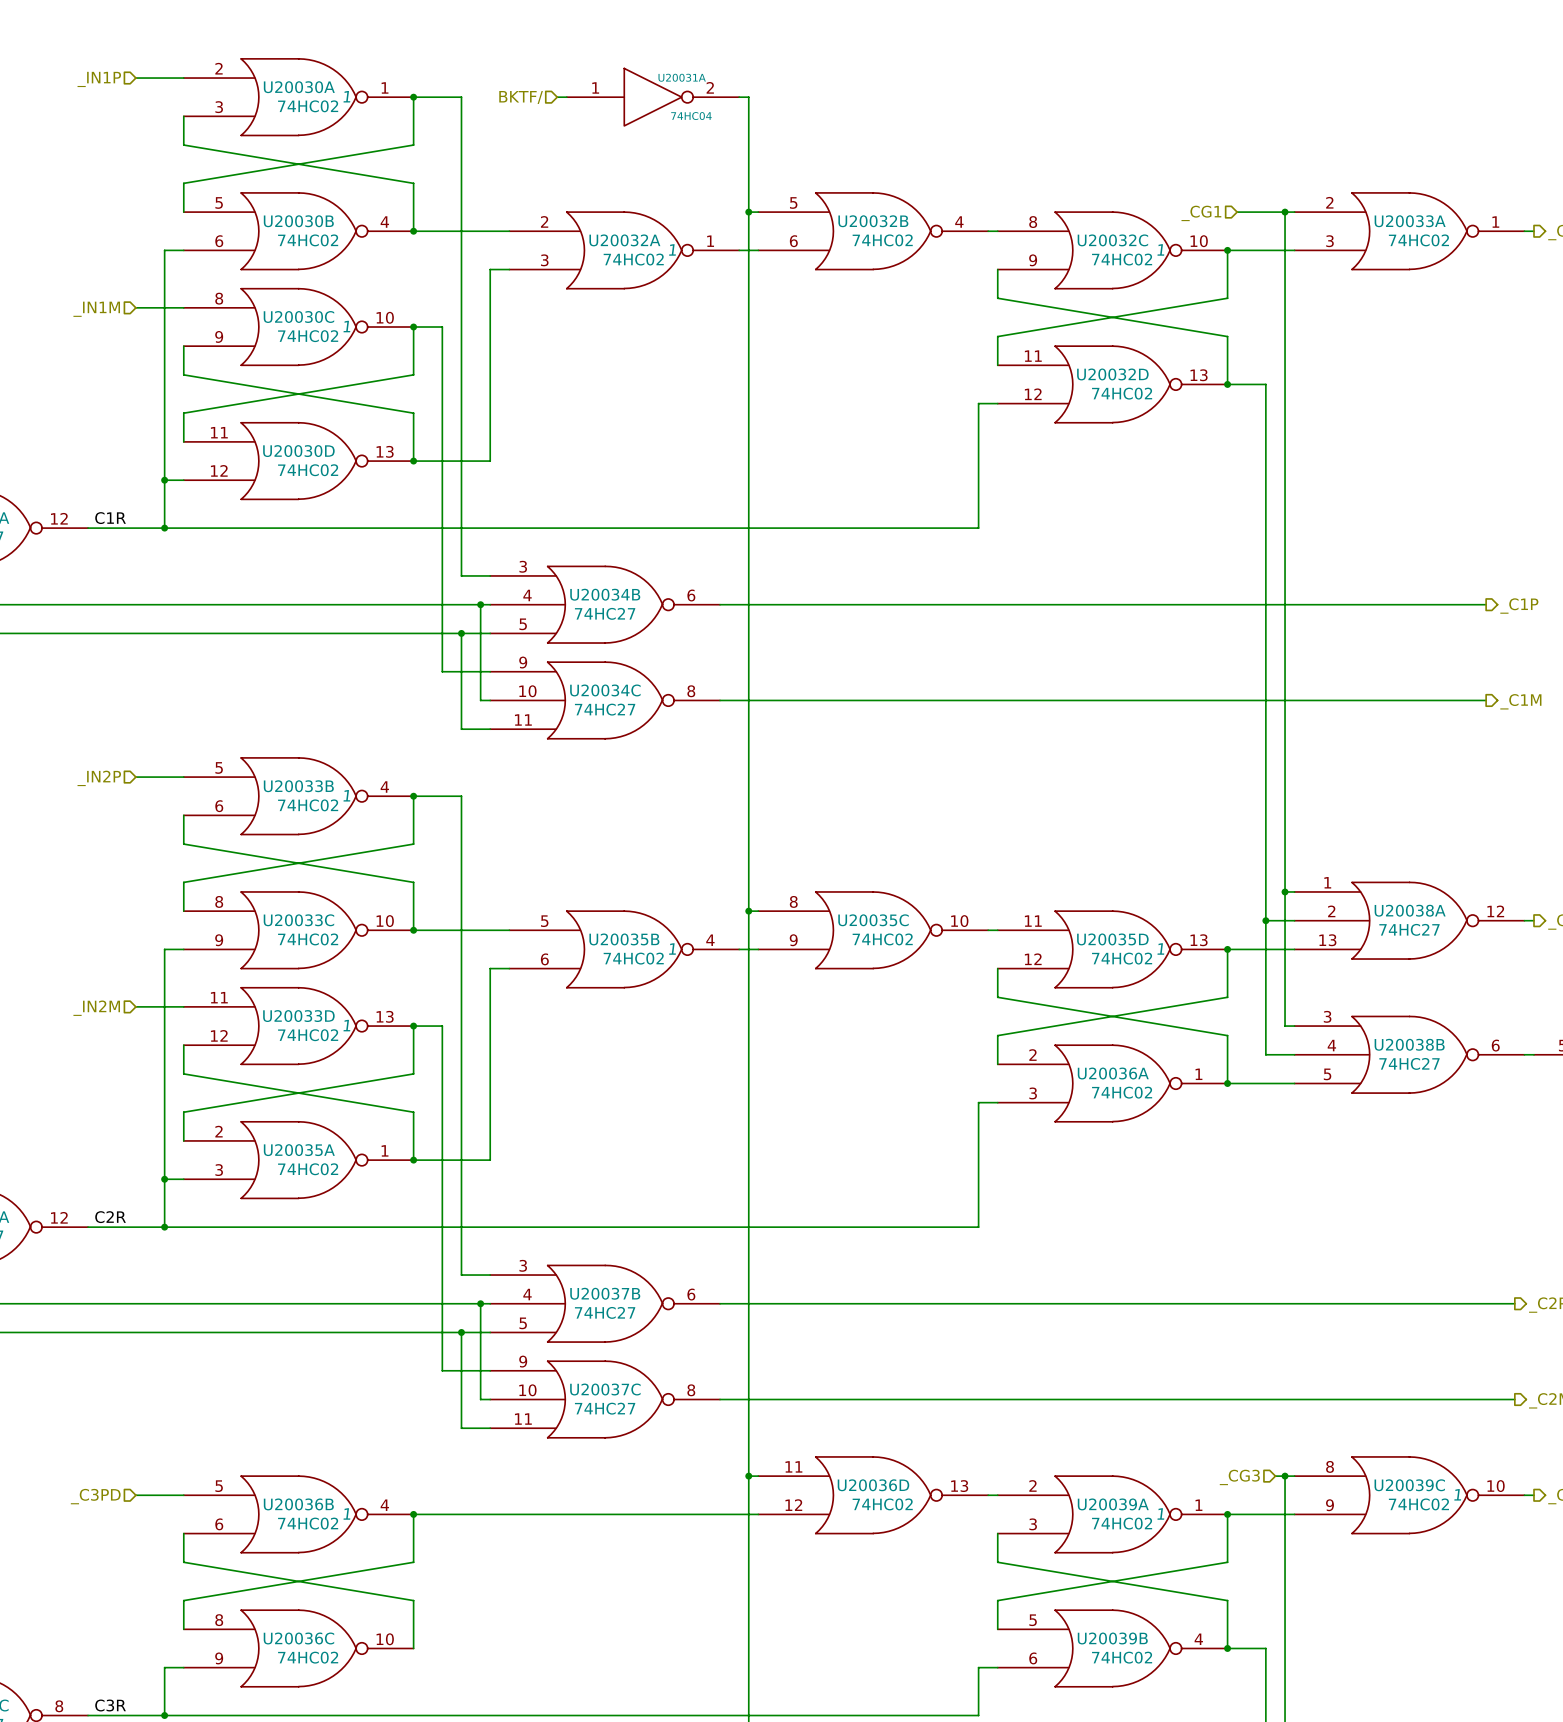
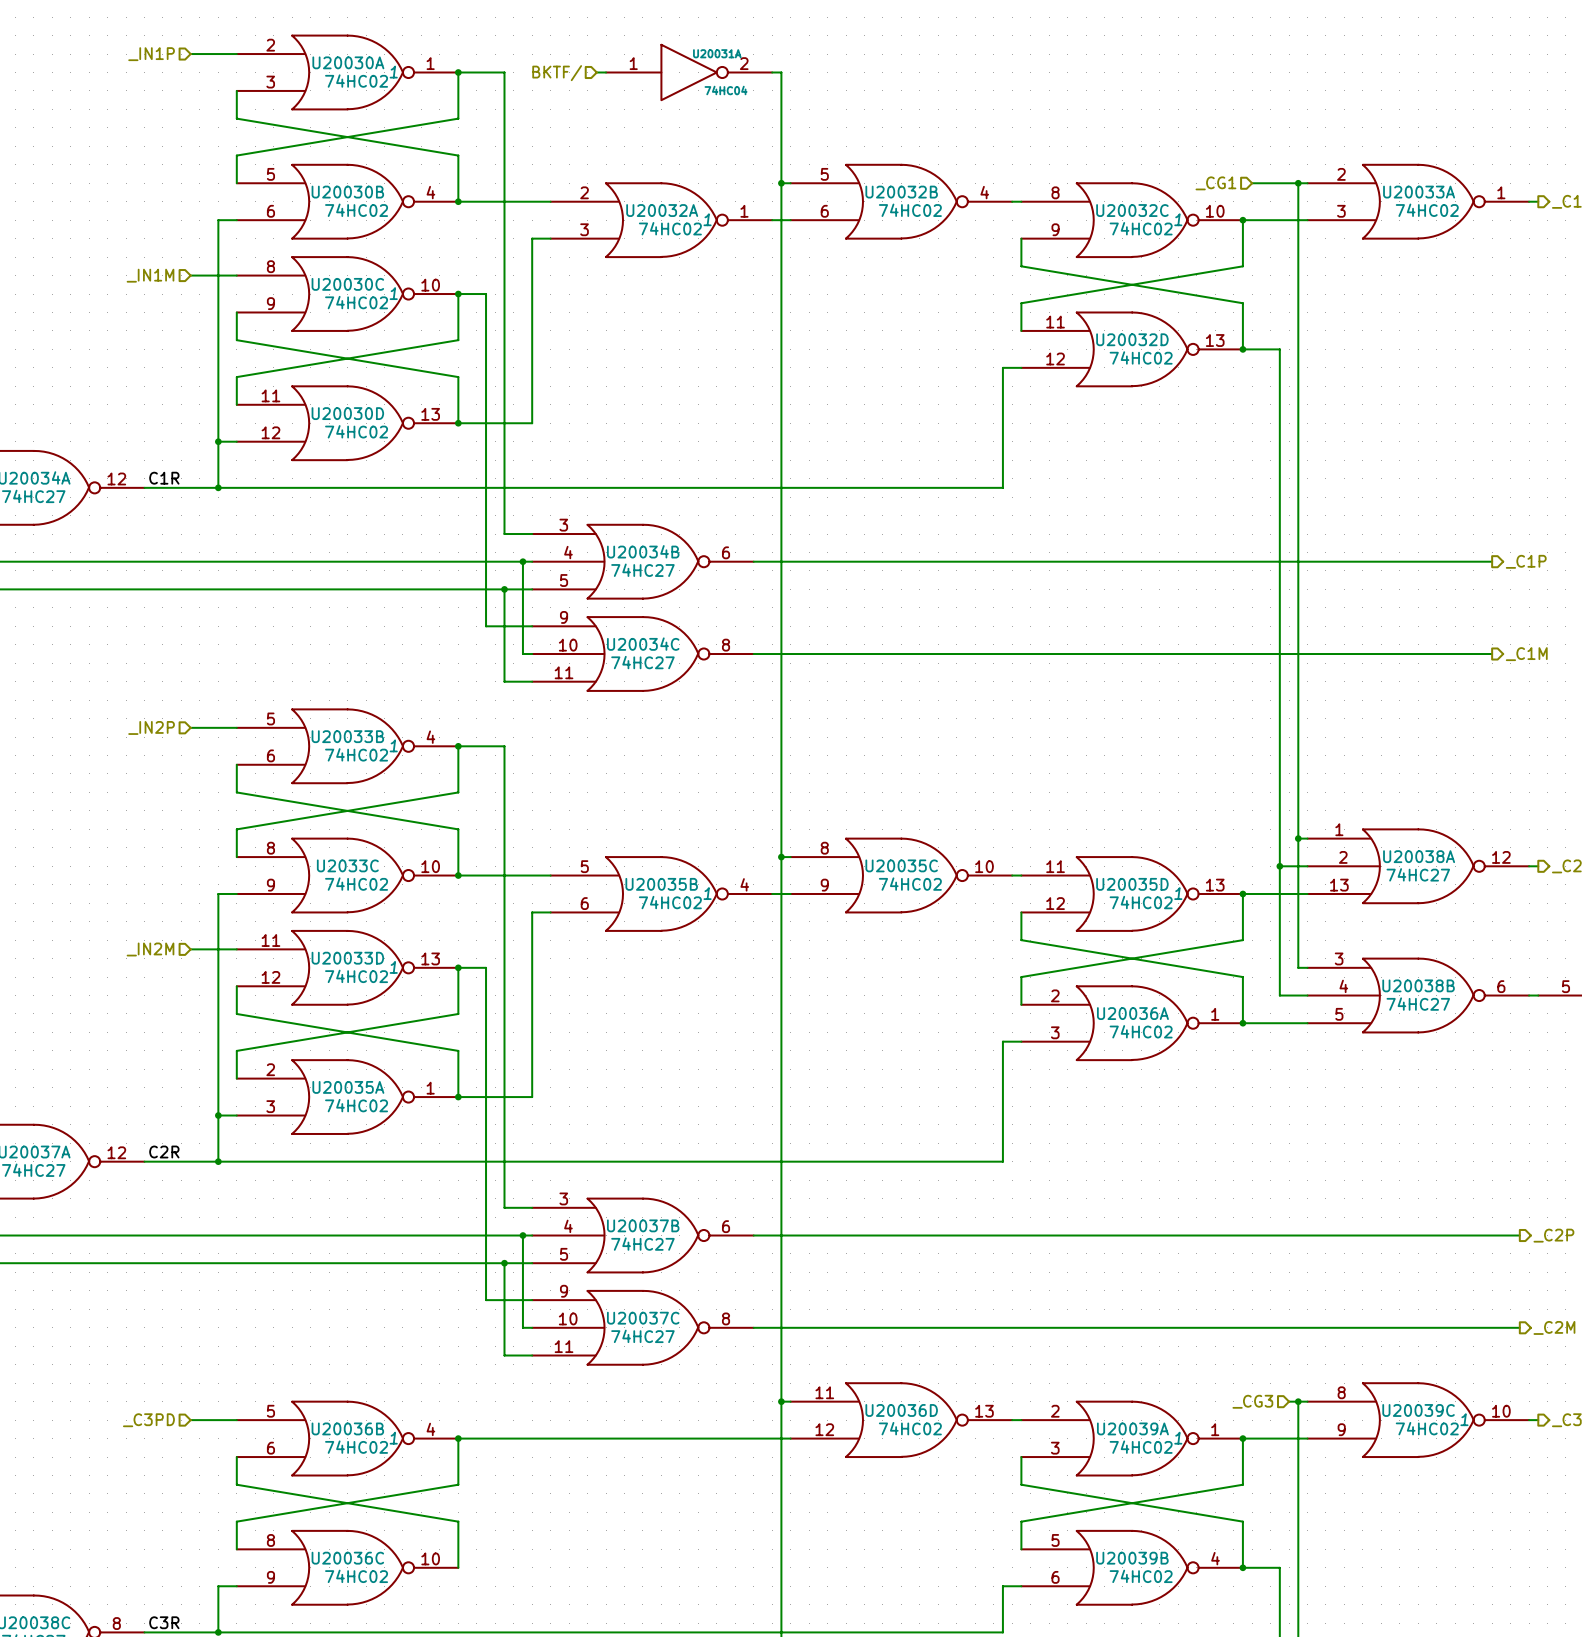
U20033C name: U20033C (298, 920) -> U2033C (347, 865)

